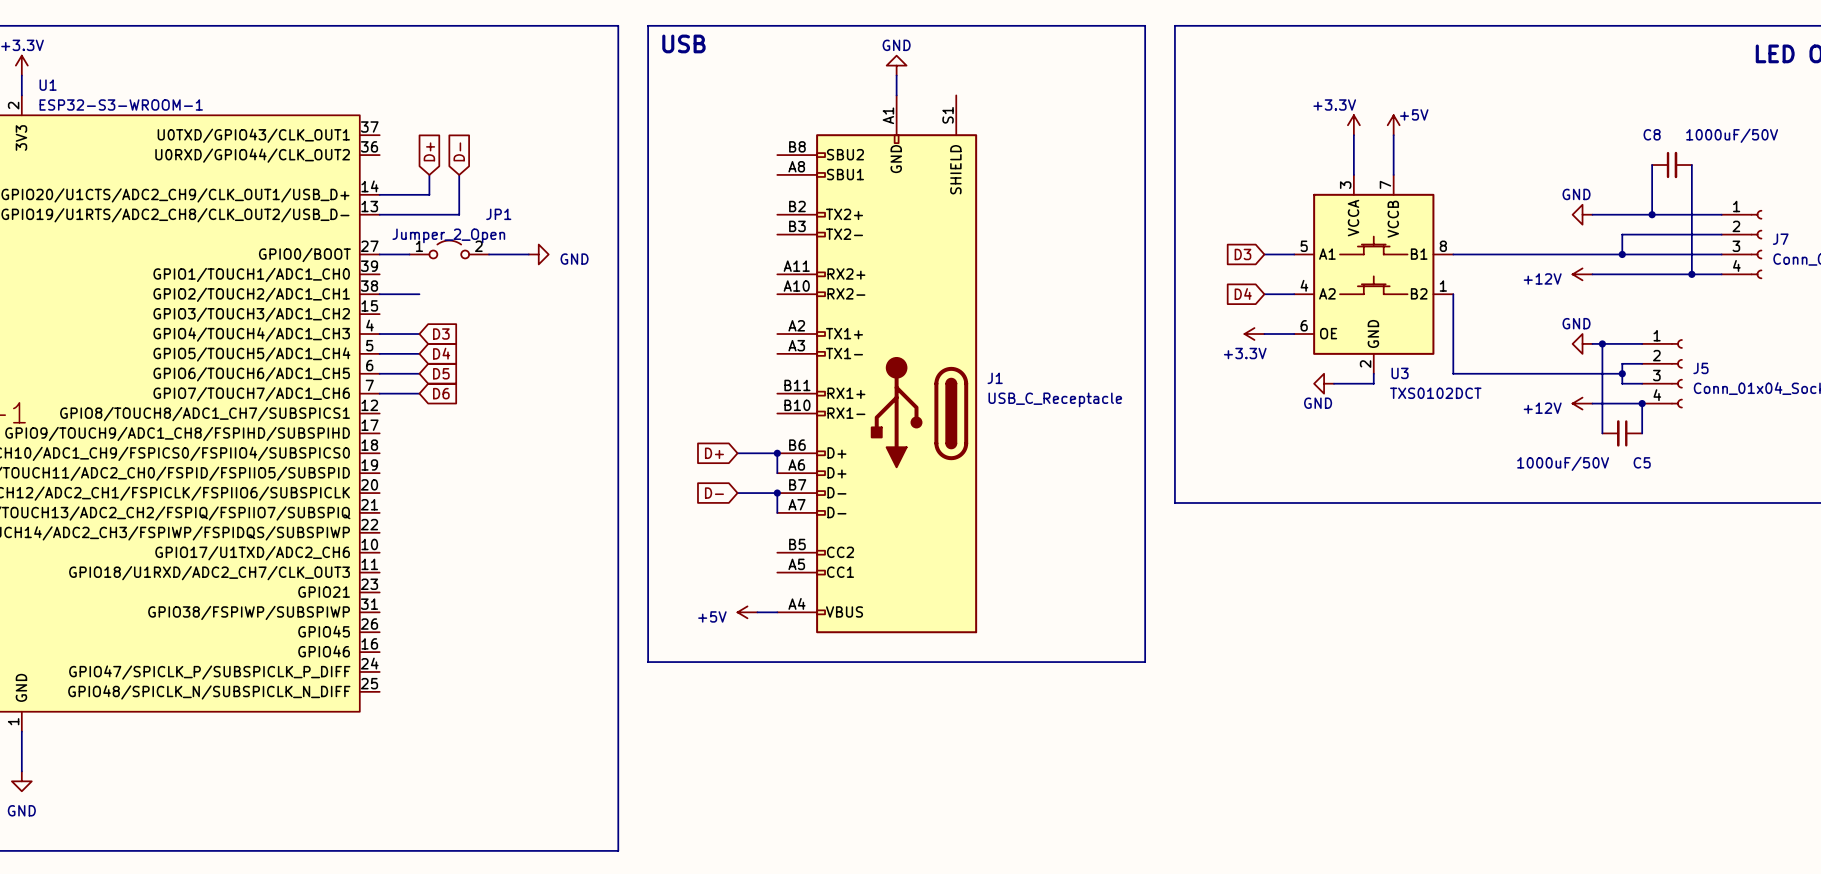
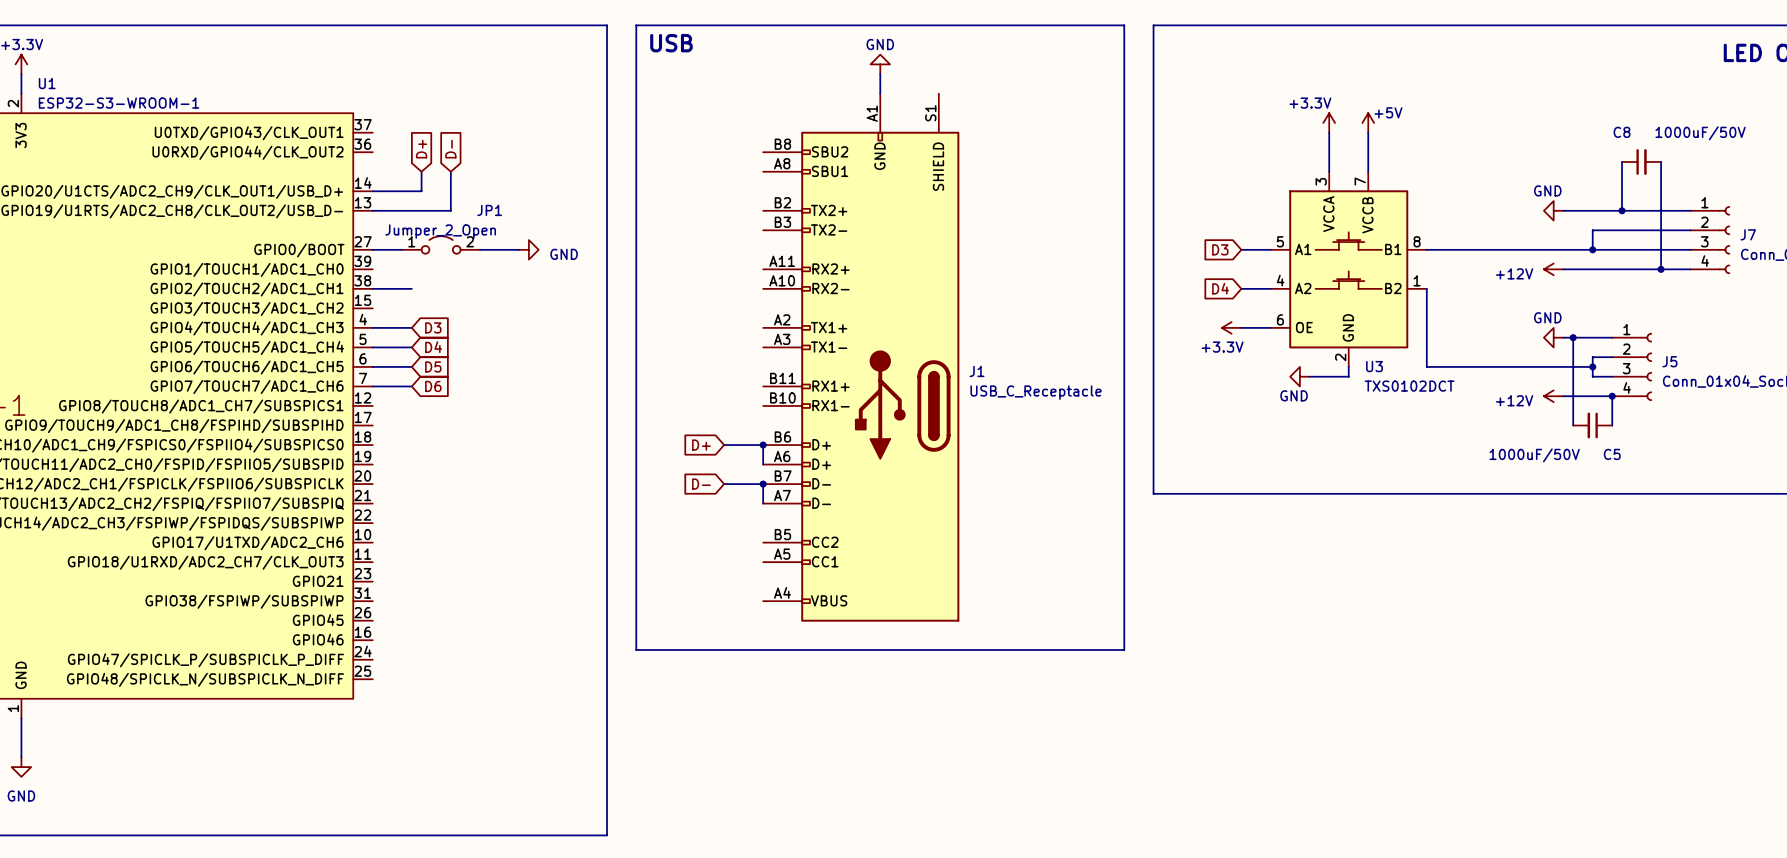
power symbol: +5V (747, 612) -> none
wire: (757, 612) (777, 612) -> none

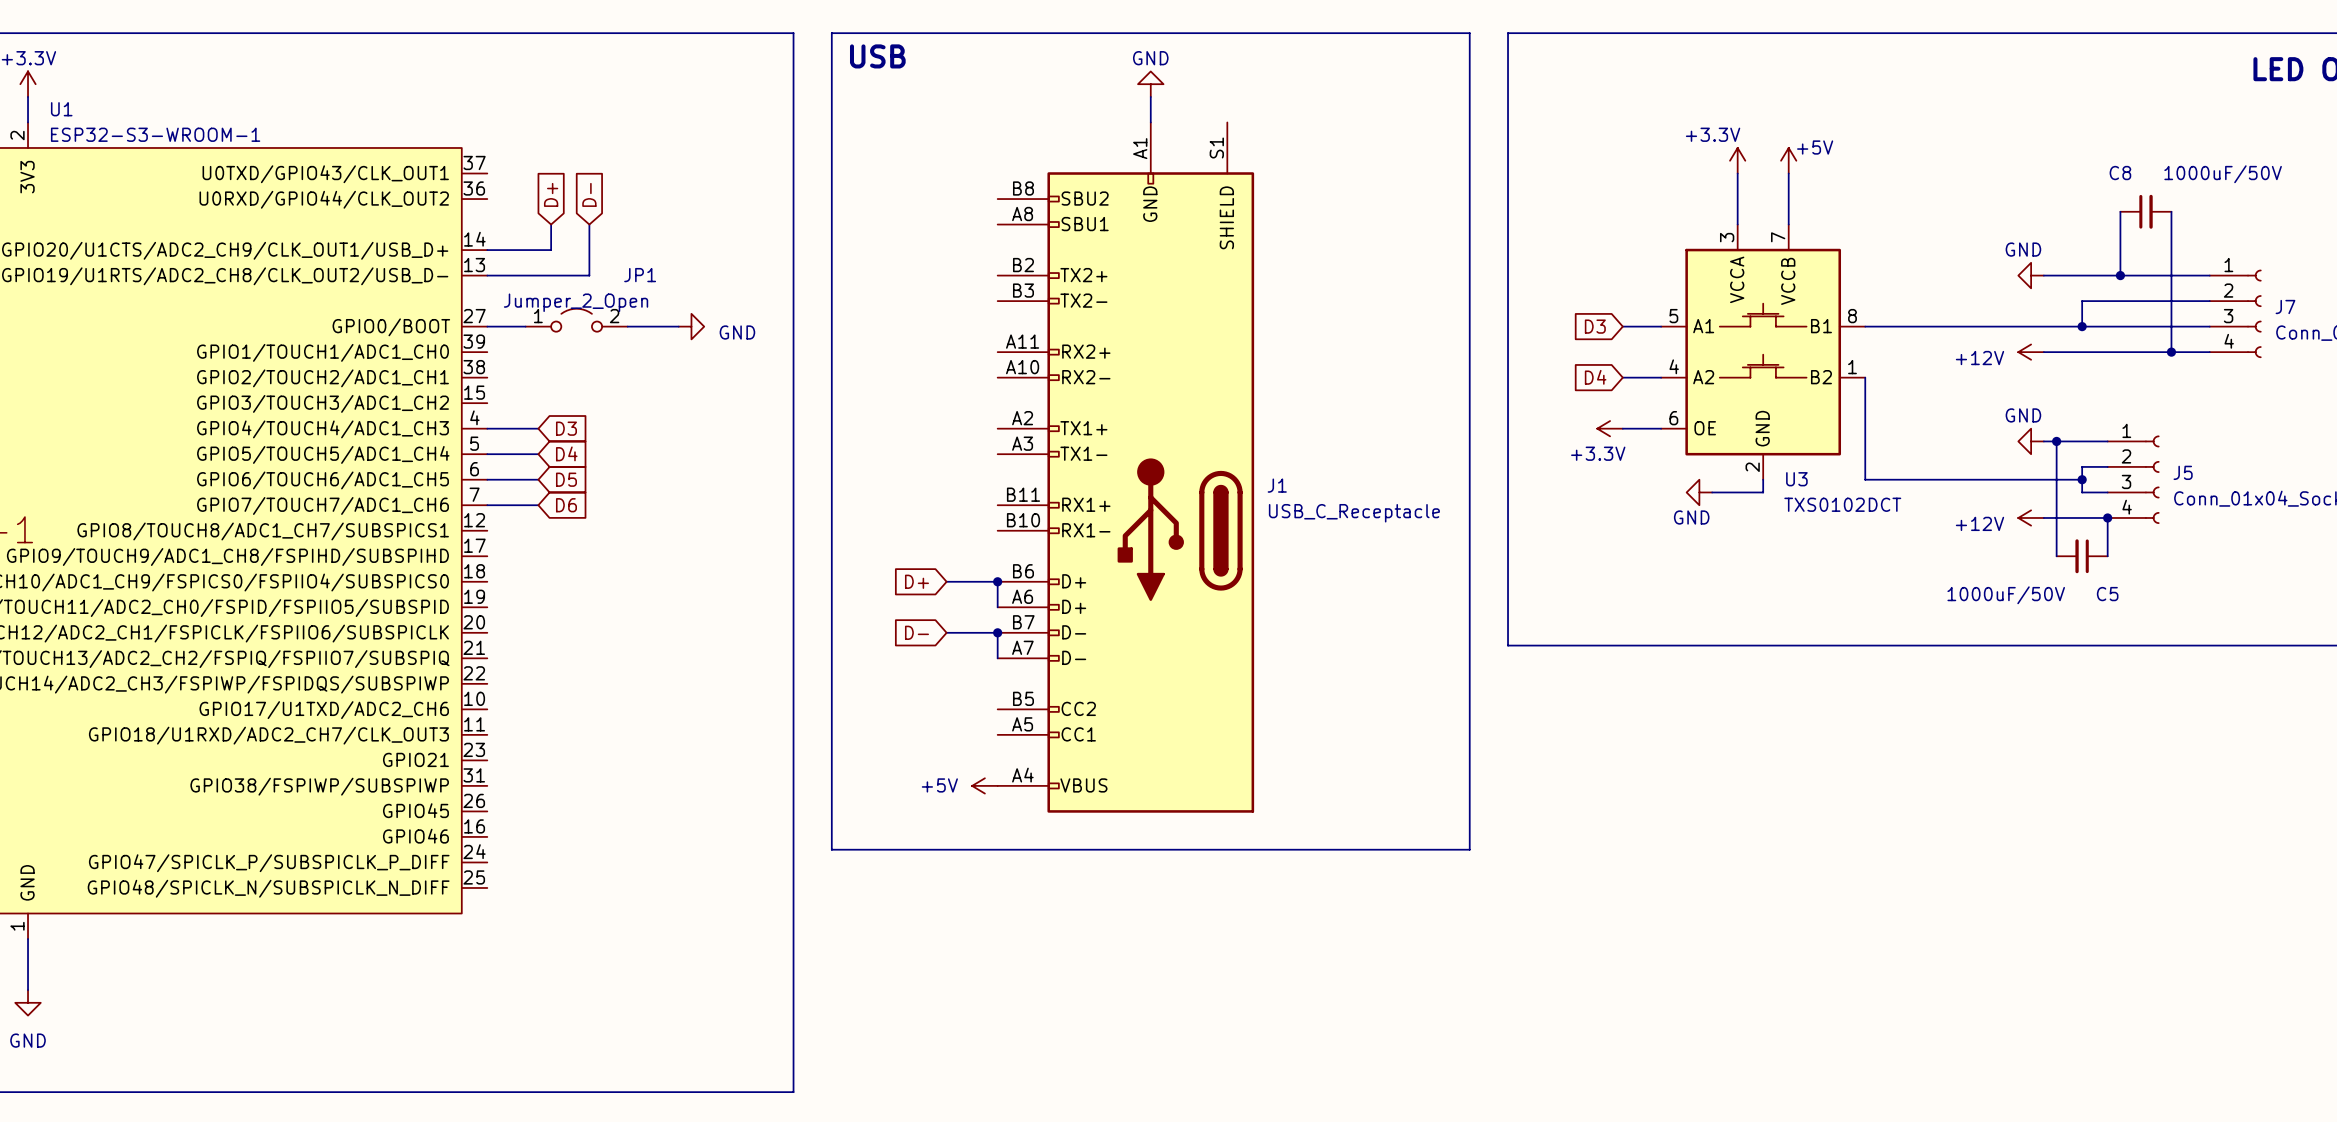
wire: (372, 288) (411, 288) -> none
power symbol: none -> +5V (984, 785)

